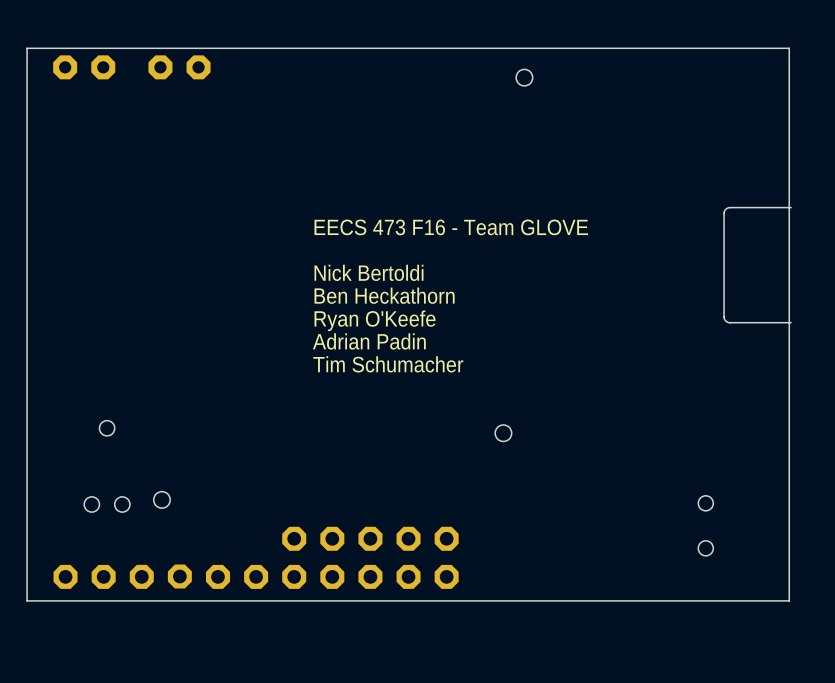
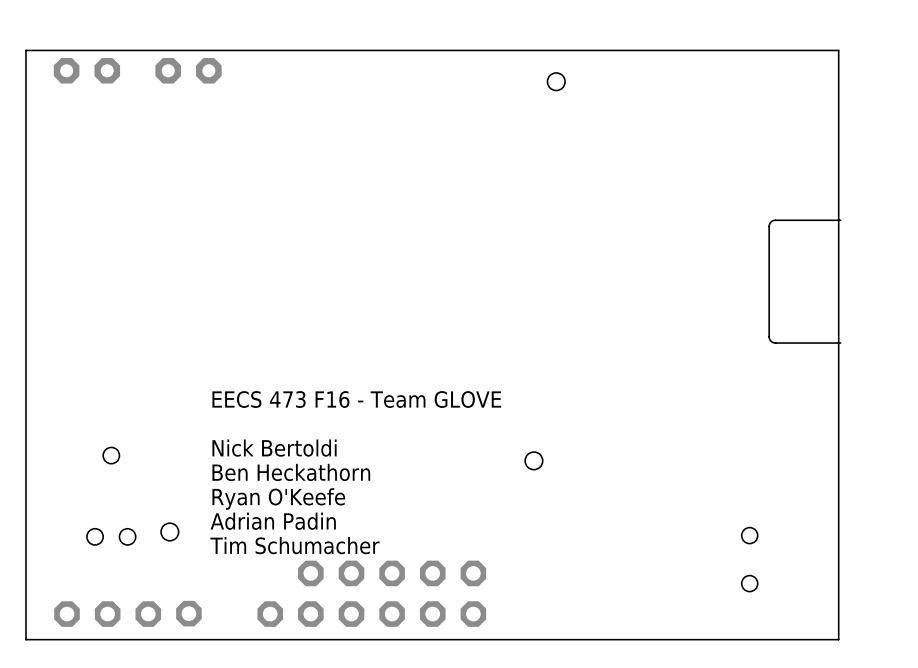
text position: EECS 473 F16 - Team GLOVE (451, 227) -> EECS 473 F16 - Team GLOVE (356, 399)
text position: Nick Bertoldi (368, 272) -> Nick Bertoldi (274, 448)
text position: Ben Heckathorn (384, 295) -> Ben Heckathorn (291, 472)
text position: Ryan O'Keefe (375, 320) -> Ryan O'Keefe (278, 499)
text position: Adrian Padin (369, 341) -> Adrian Padin (273, 521)
text position: Tim Schumacher (388, 364) -> Tim Schumacher (295, 545)
part: (217, 576) -> none

